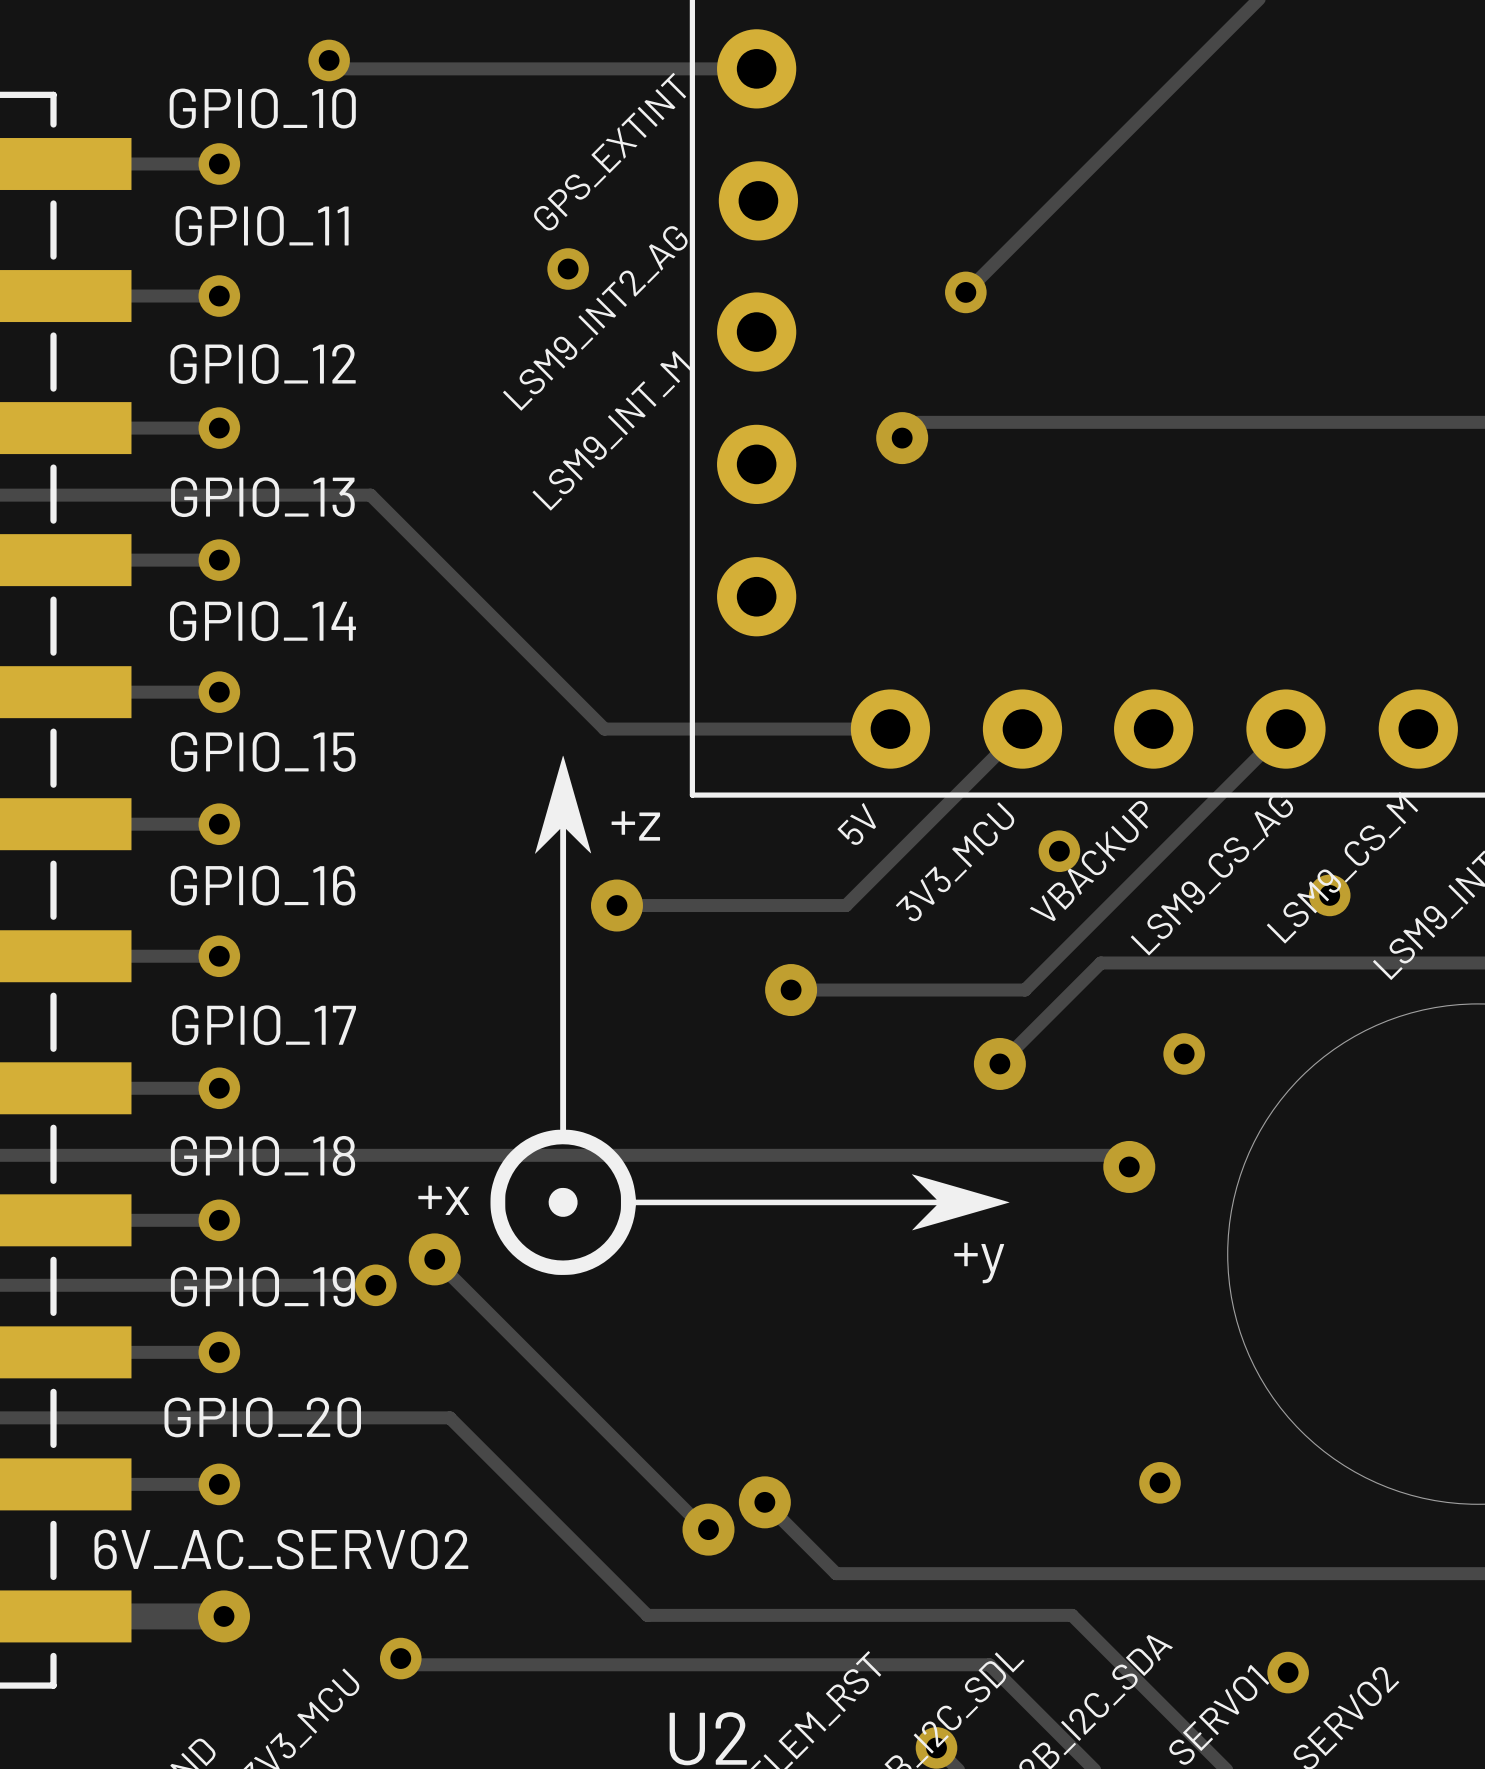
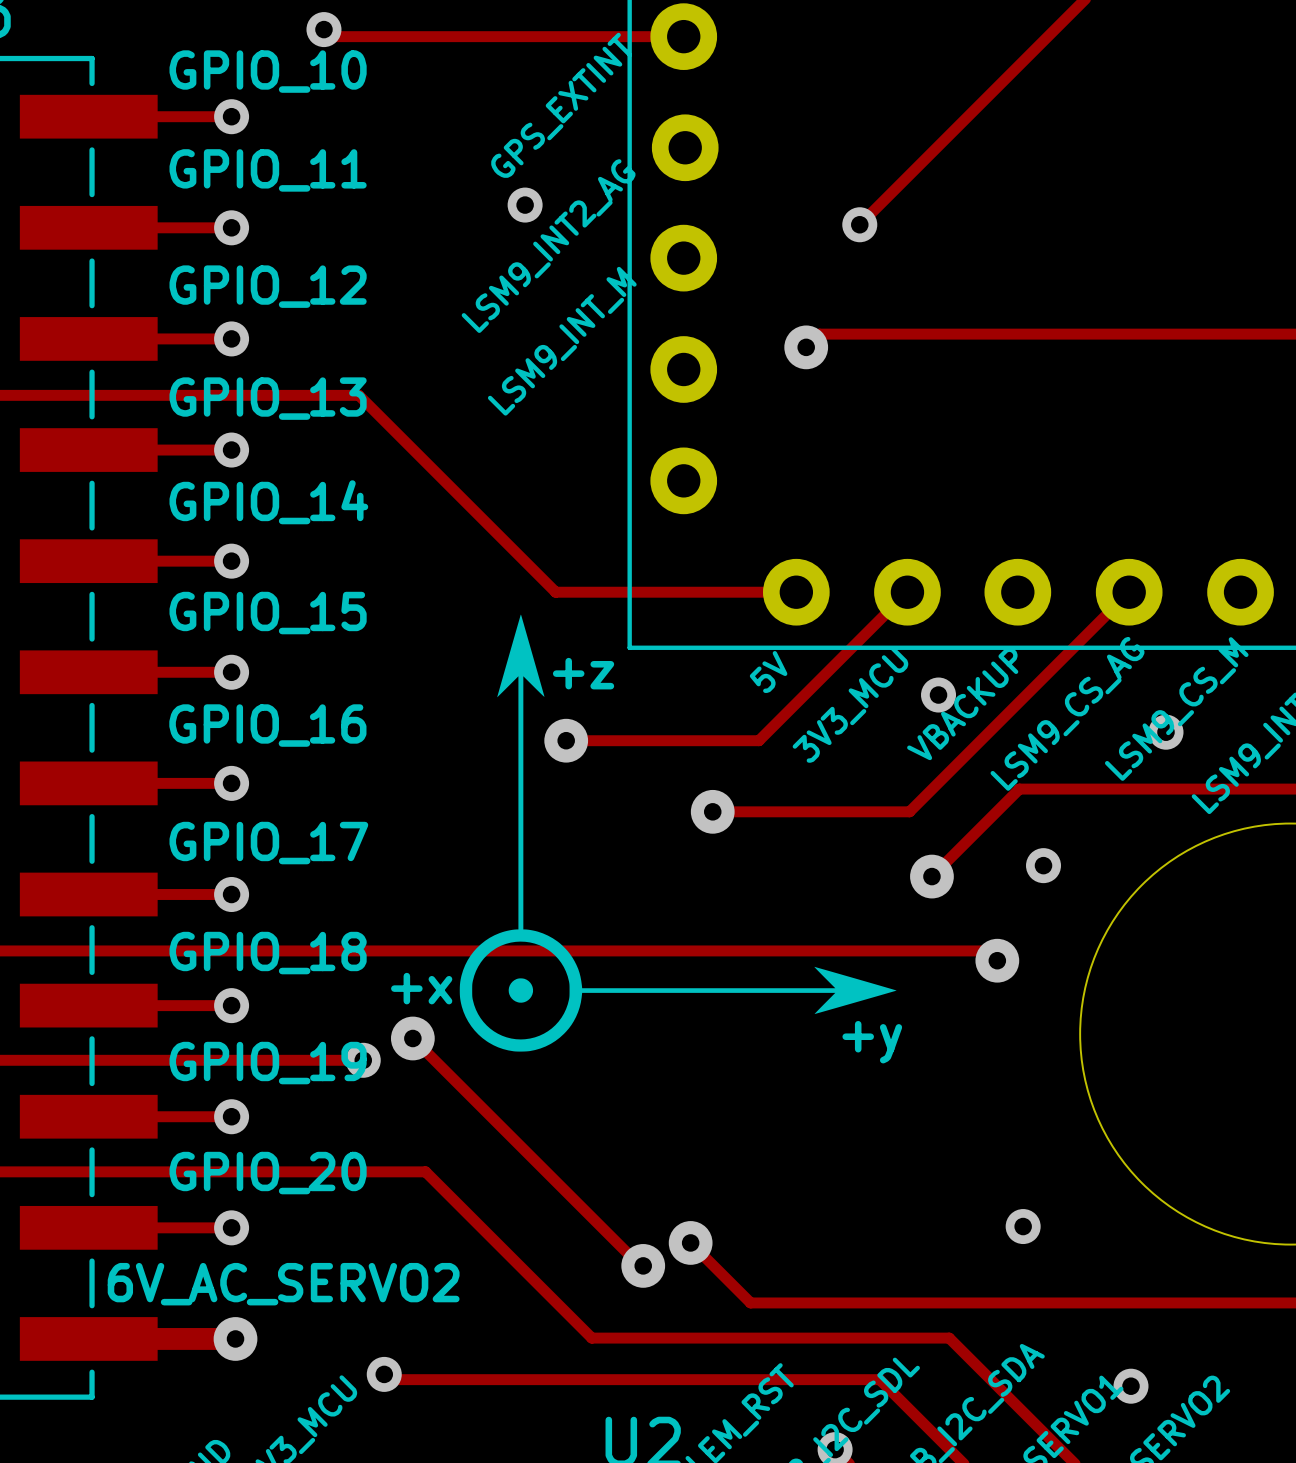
track: (1155, 962) (1100, 962) (999, 1063) -> (1019, 789) (931, 876)
via position: (999, 1063) -> (931, 876)

